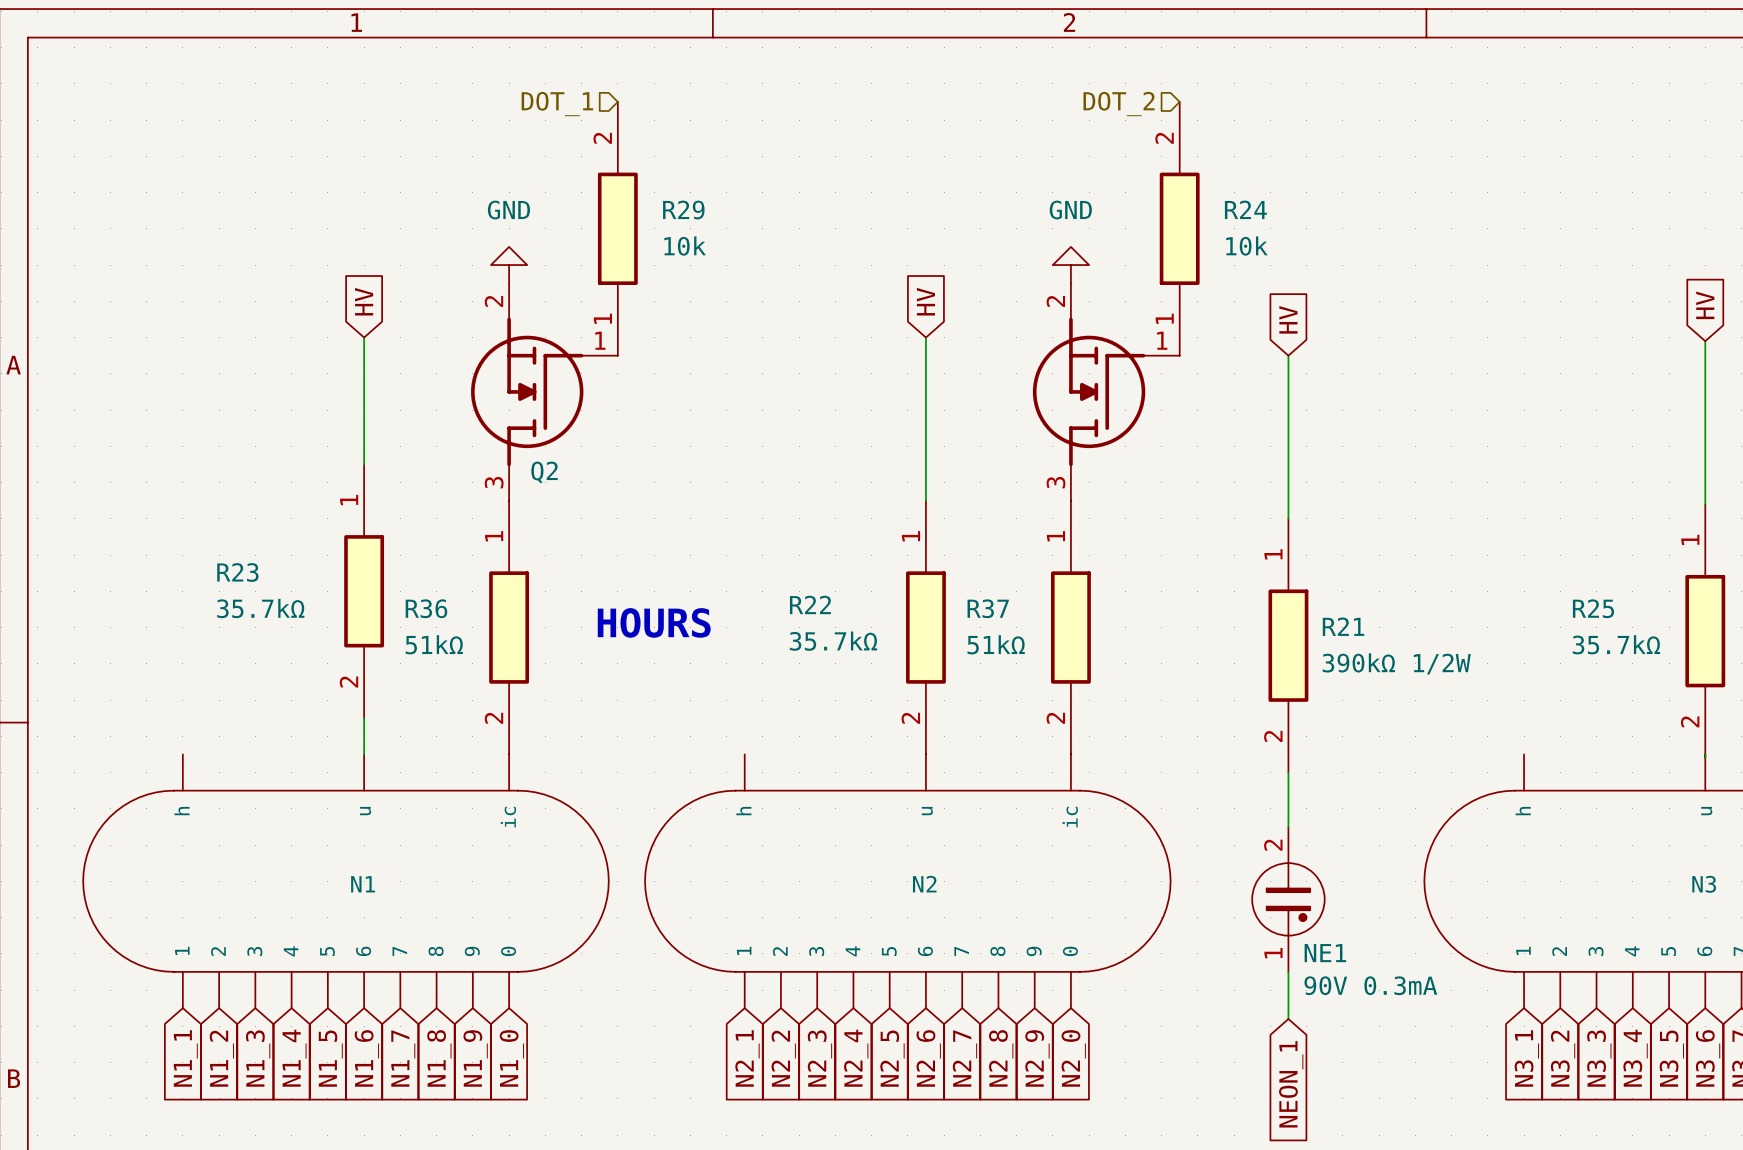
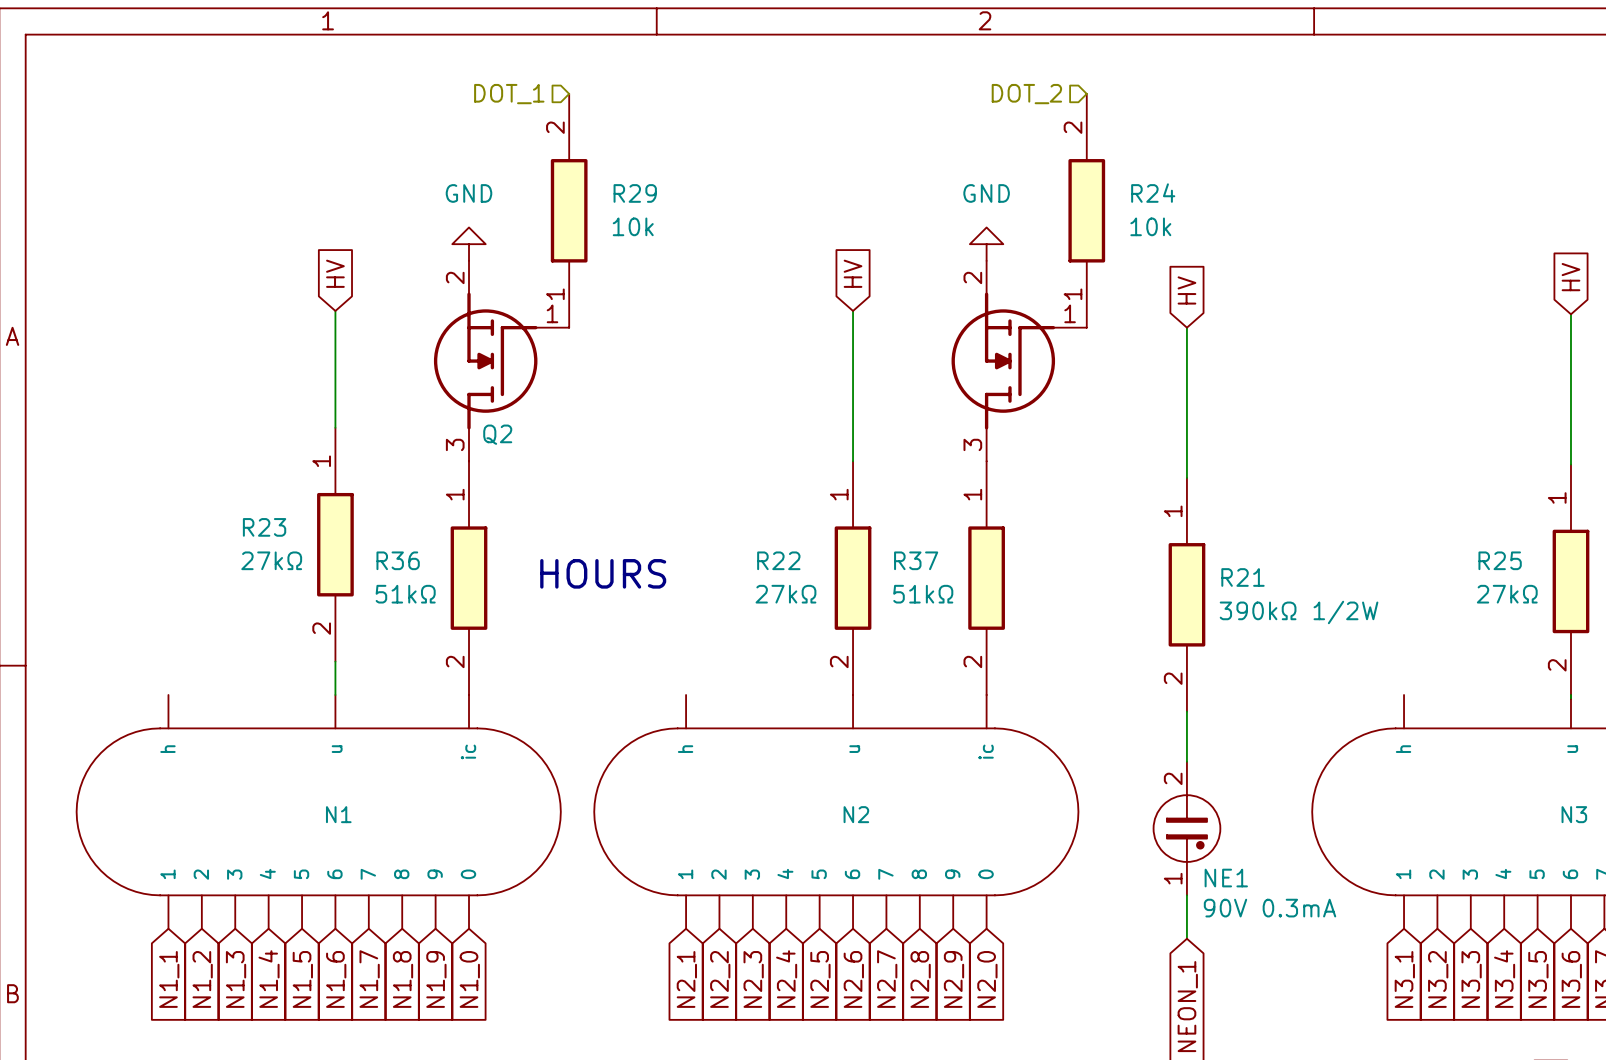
R23 name position: R23 (237, 572) -> R23 (264, 527)
R22 name position: R22 (810, 604) -> R22 (778, 560)
R23 value: 35.7kΩ (260, 608) -> 27kΩ (271, 560)
R25 name position: R25 (1593, 608) -> R25 (1500, 560)
R22 value: 35.7kΩ (833, 641) -> 27kΩ (785, 594)
R25 value: 35.7kΩ (1616, 644) -> 27kΩ (1507, 594)

